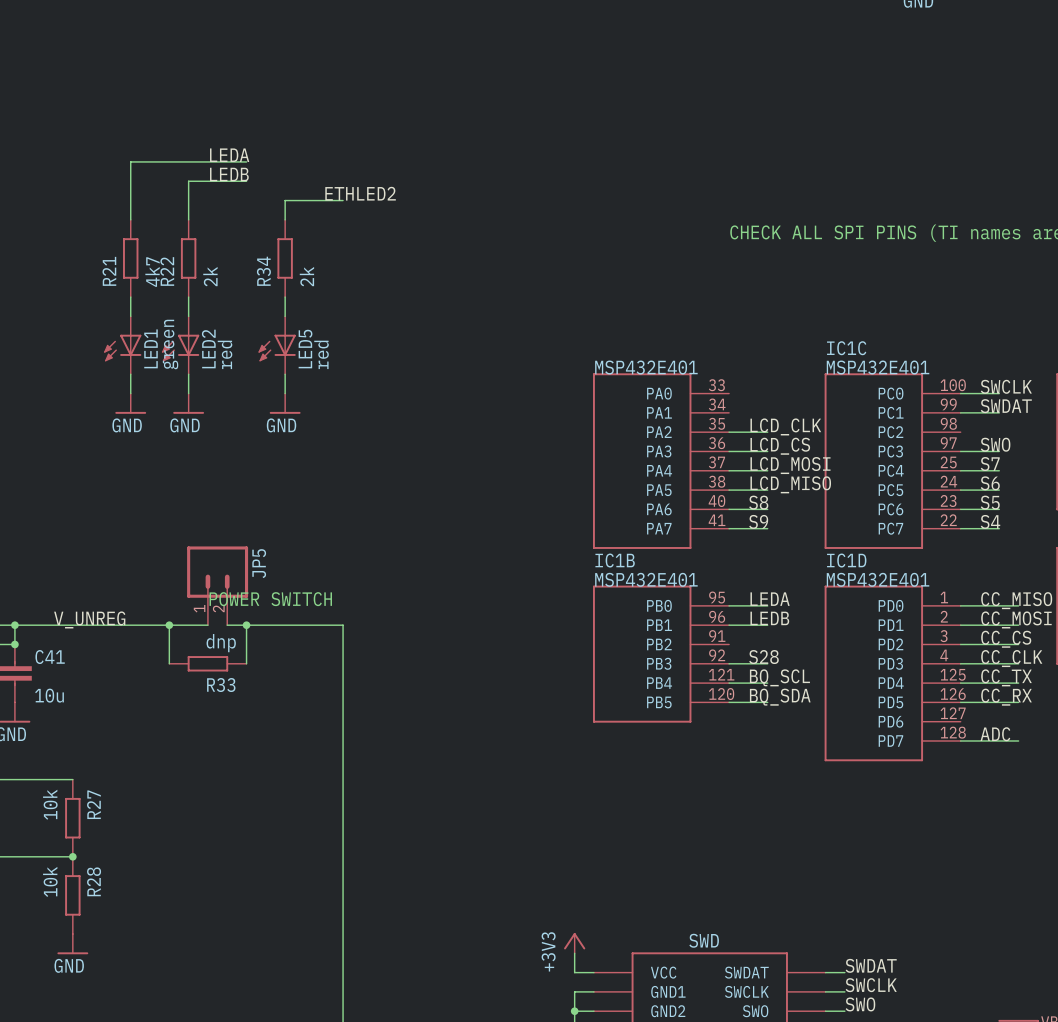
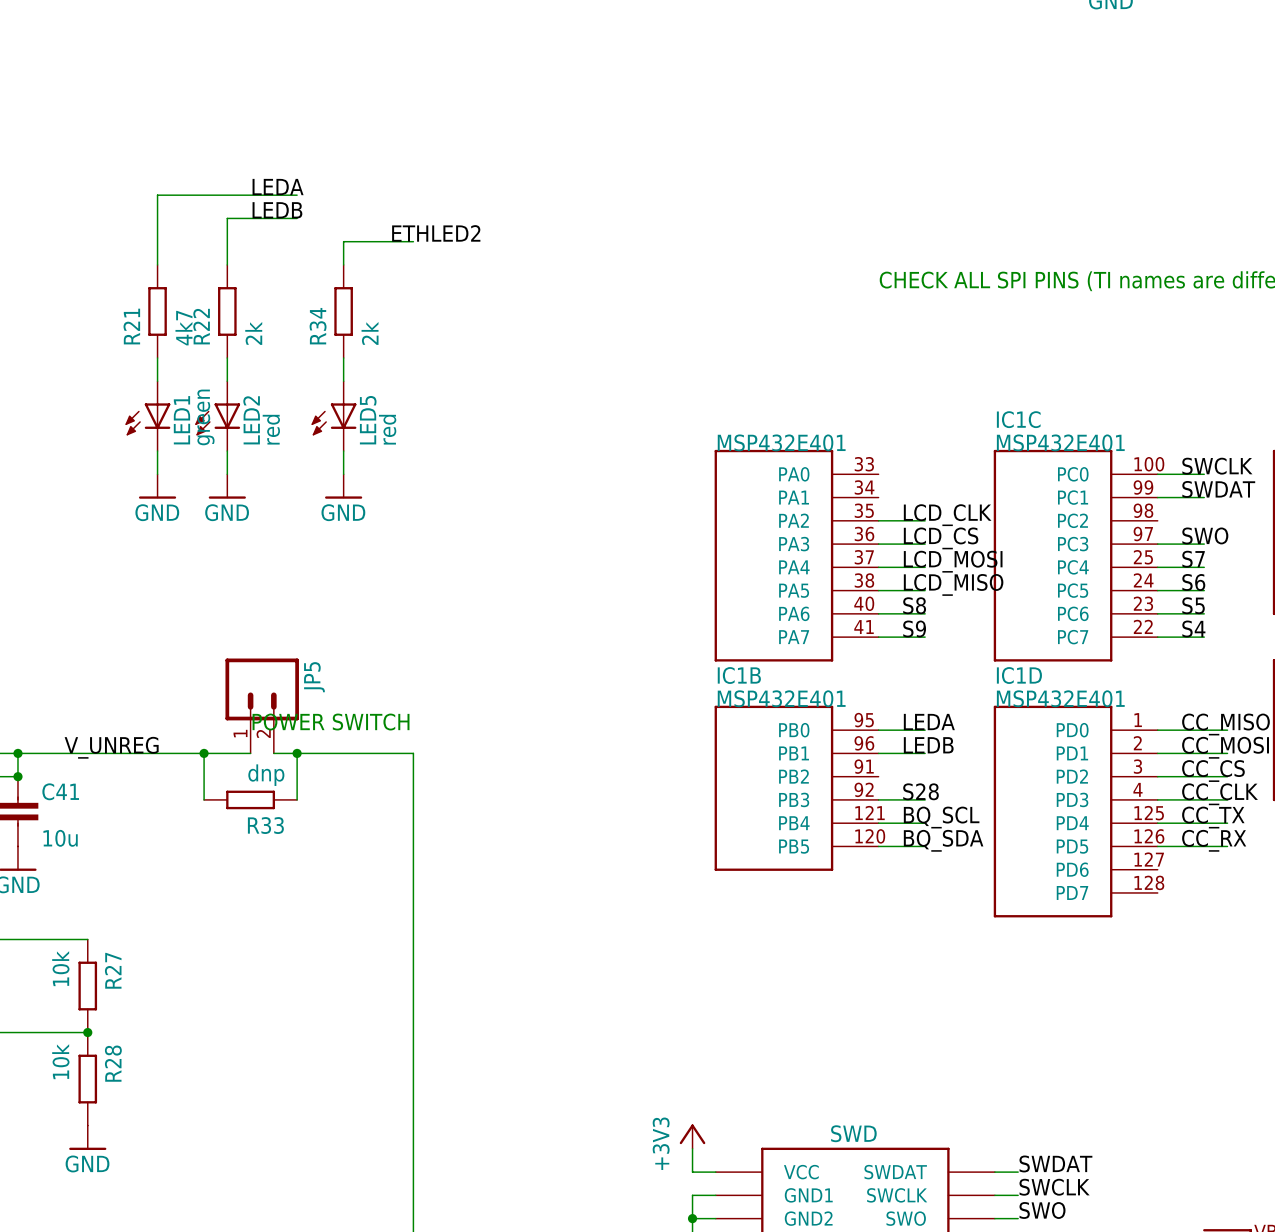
label: ADC (995, 734) -> none
wire: (960, 740) (1018, 740) -> none

